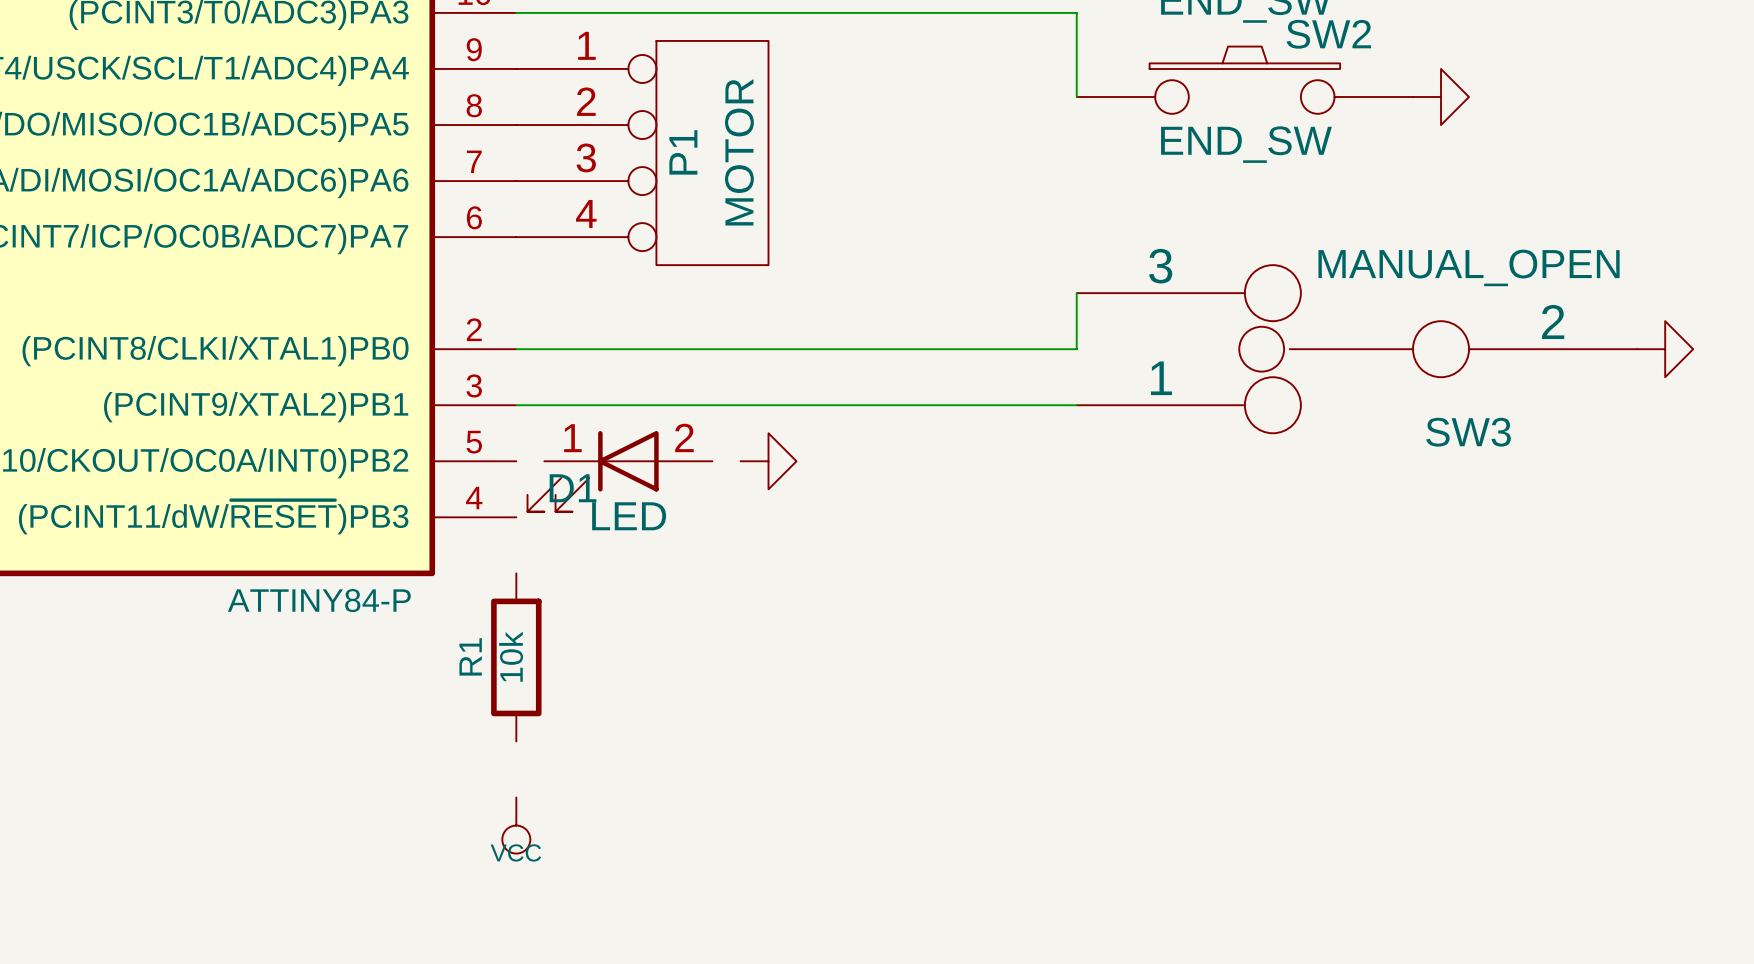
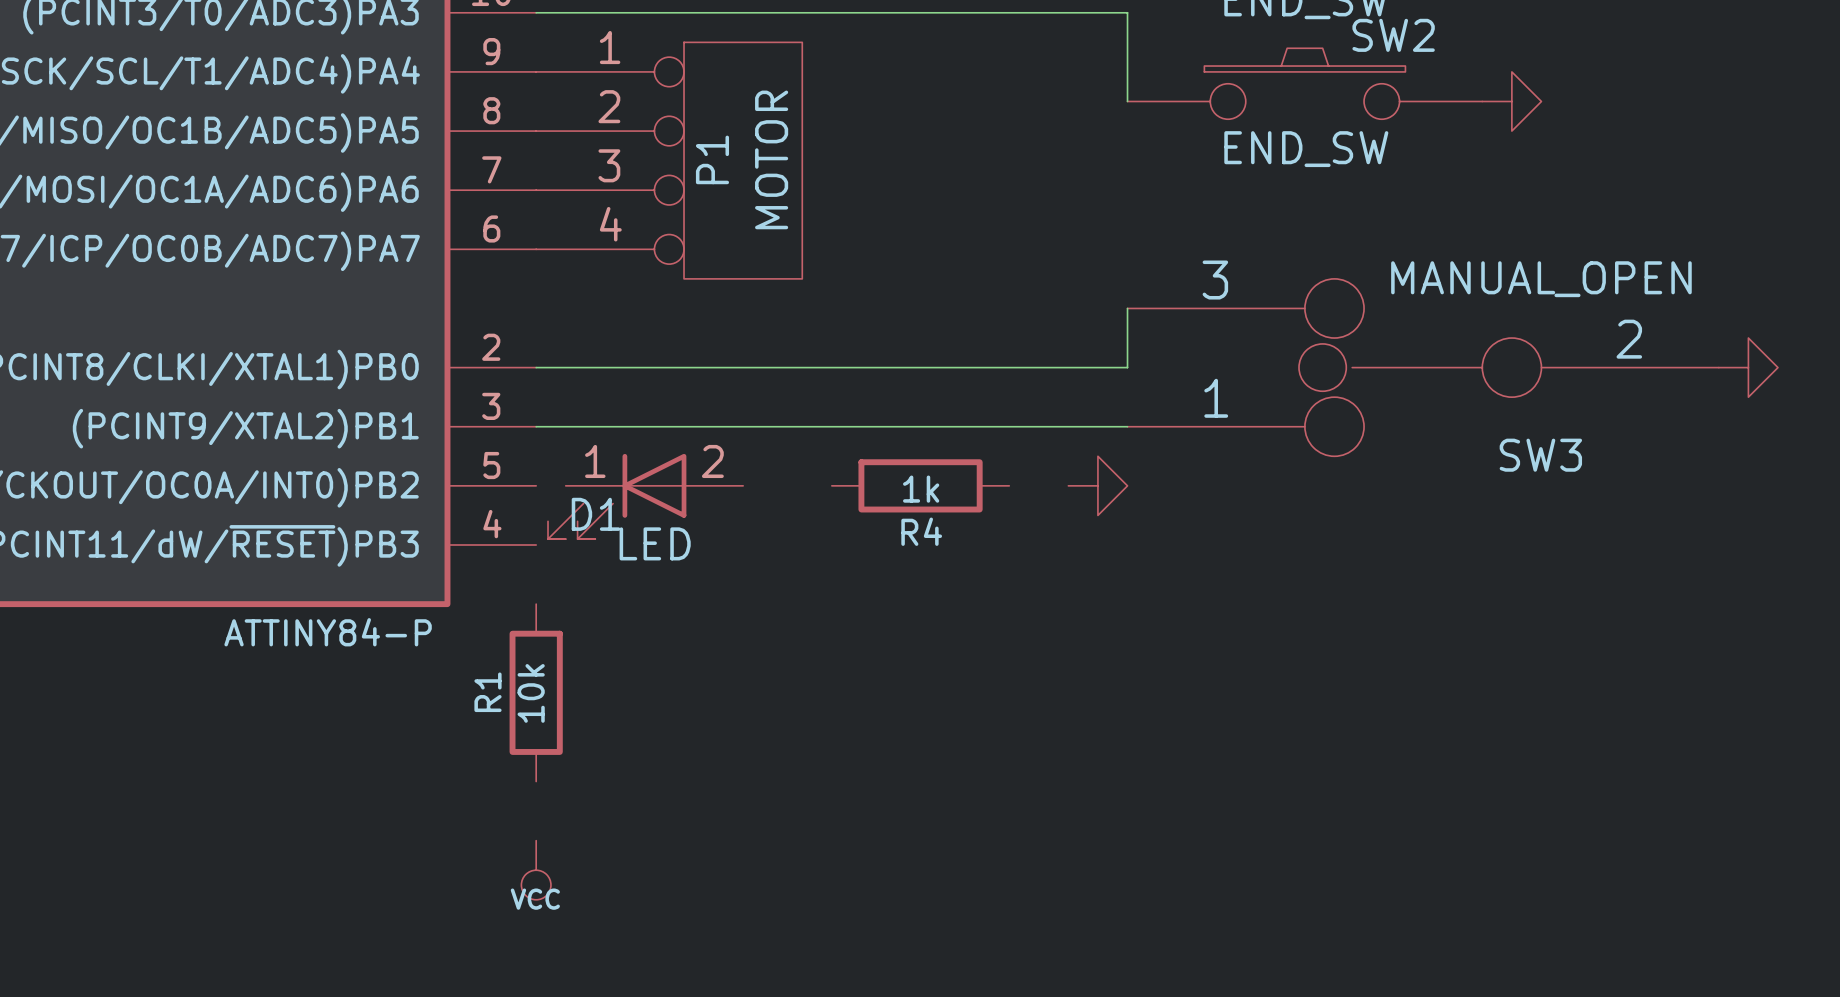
power symbol position: (768, 461) -> (1097, 485)
R4: none -> 1k (920, 485)

